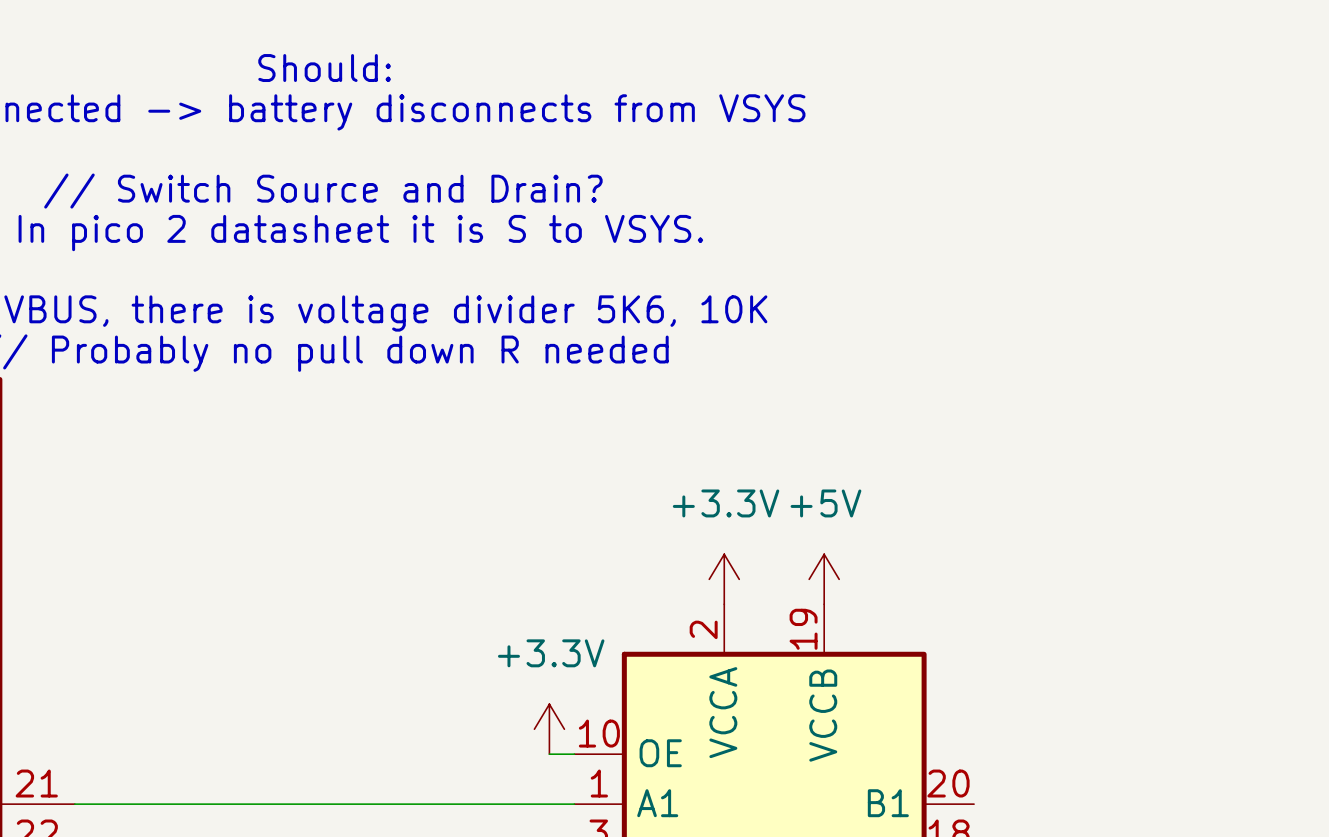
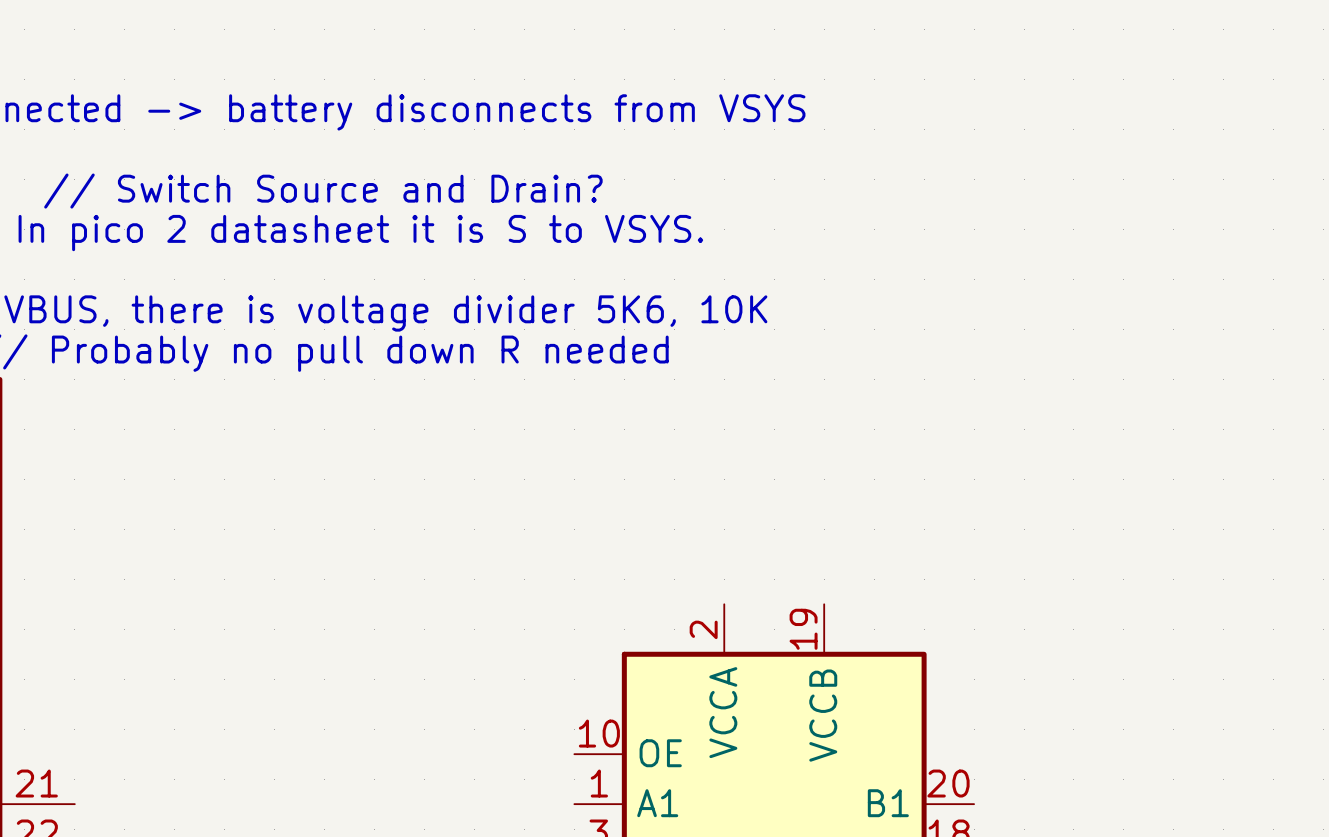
text: Should: (324, 68) -> none
power symbol: +3.3V (724, 579) -> none
power symbol: +5V (824, 579) -> none
power symbol: +3.3V (549, 729) -> none
wire: (549, 754) (574, 754) -> none
wire: (74, 804) (574, 804) -> none

